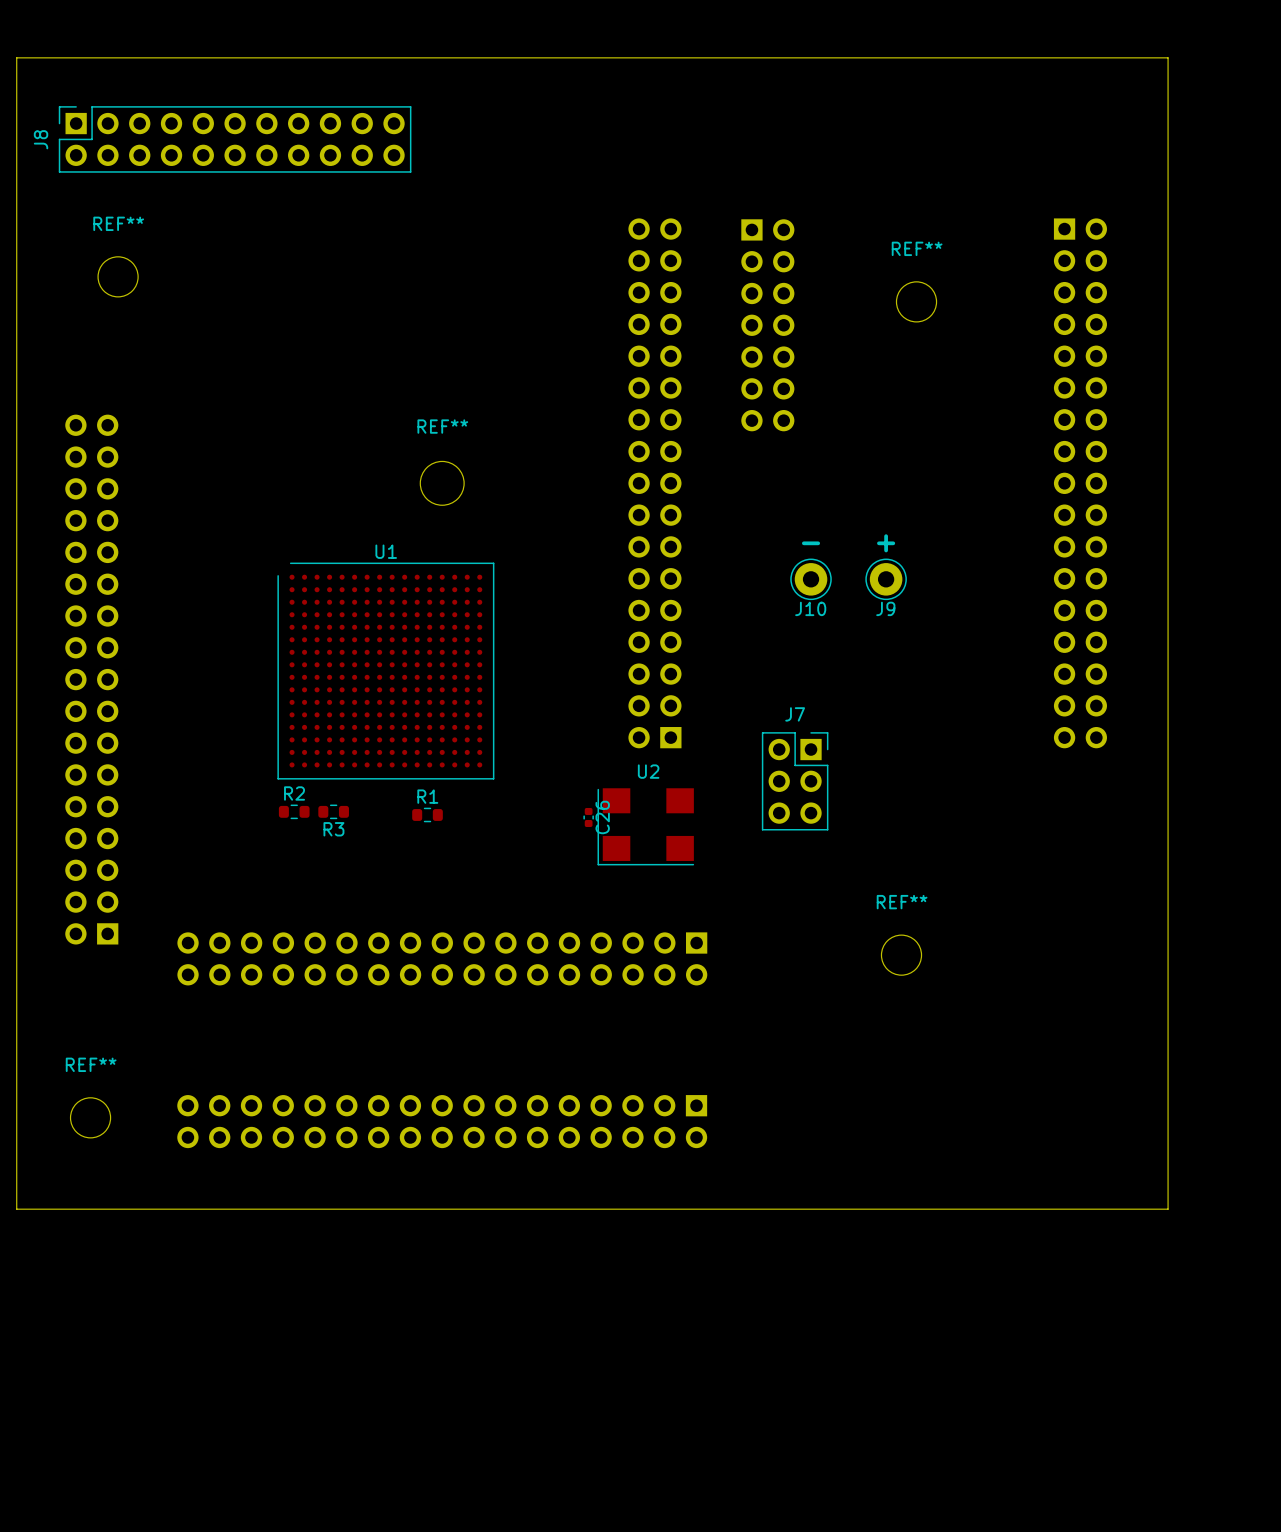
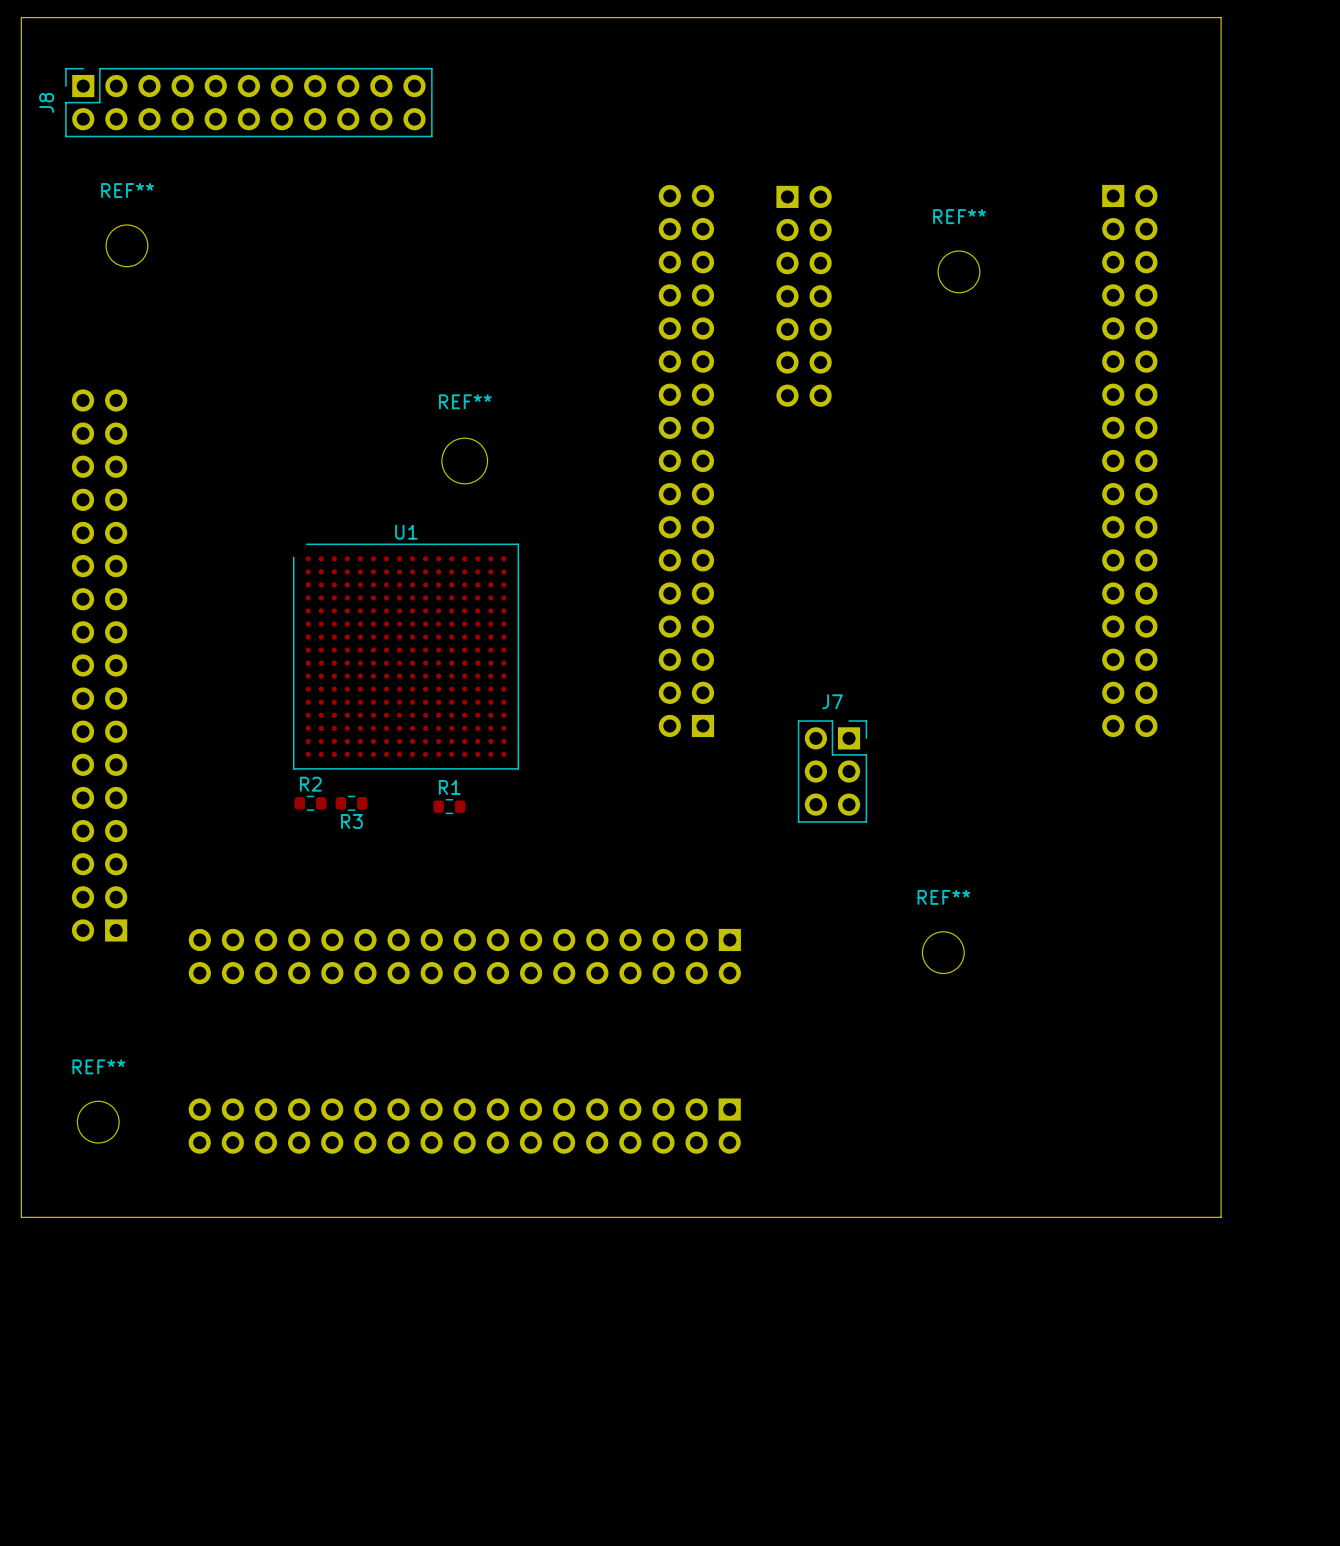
text: - (811, 543) -> none
text: + (886, 543) -> none
J10: (811, 579) -> none
J9: (886, 579) -> none
C26: (588, 817) -> none
U2: (645, 826) -> none

